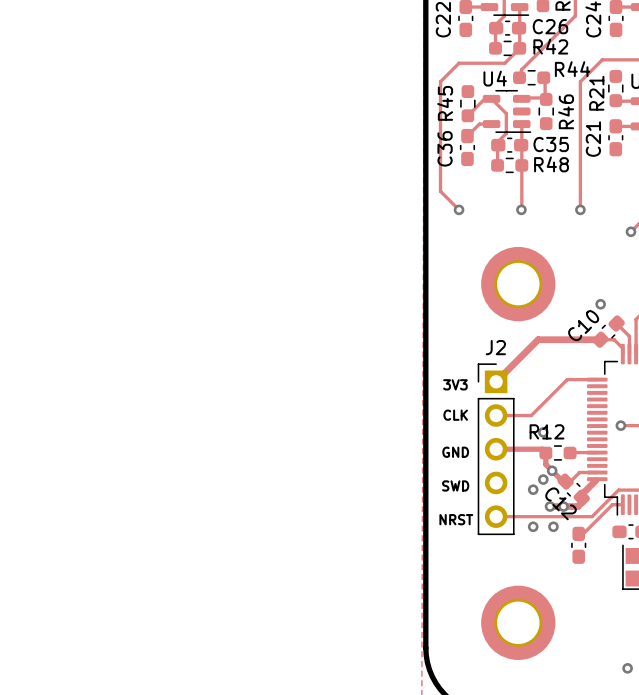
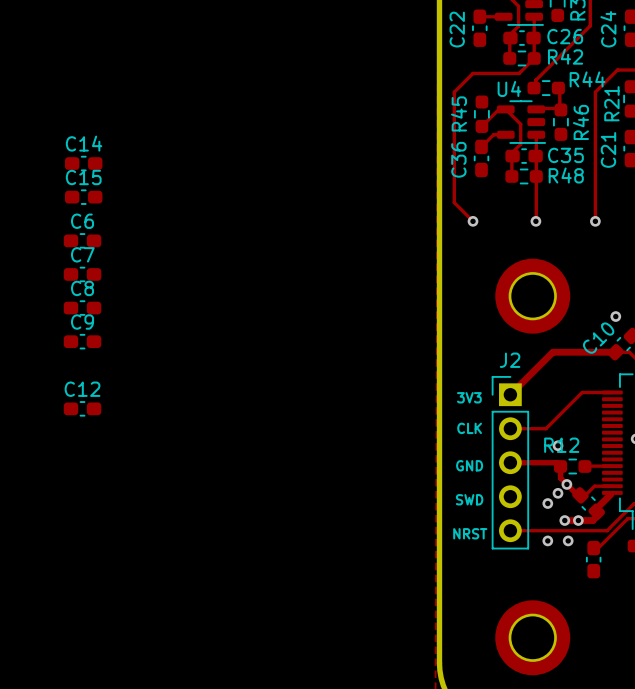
C14: none -> (83, 163)
C15: none -> (83, 197)
C6: none -> (82, 240)
C7: none -> (82, 274)
C8: none -> (82, 308)
C9: none -> (82, 341)
C12: none -> (82, 408)
C12 name: C12 (561, 503) -> none

